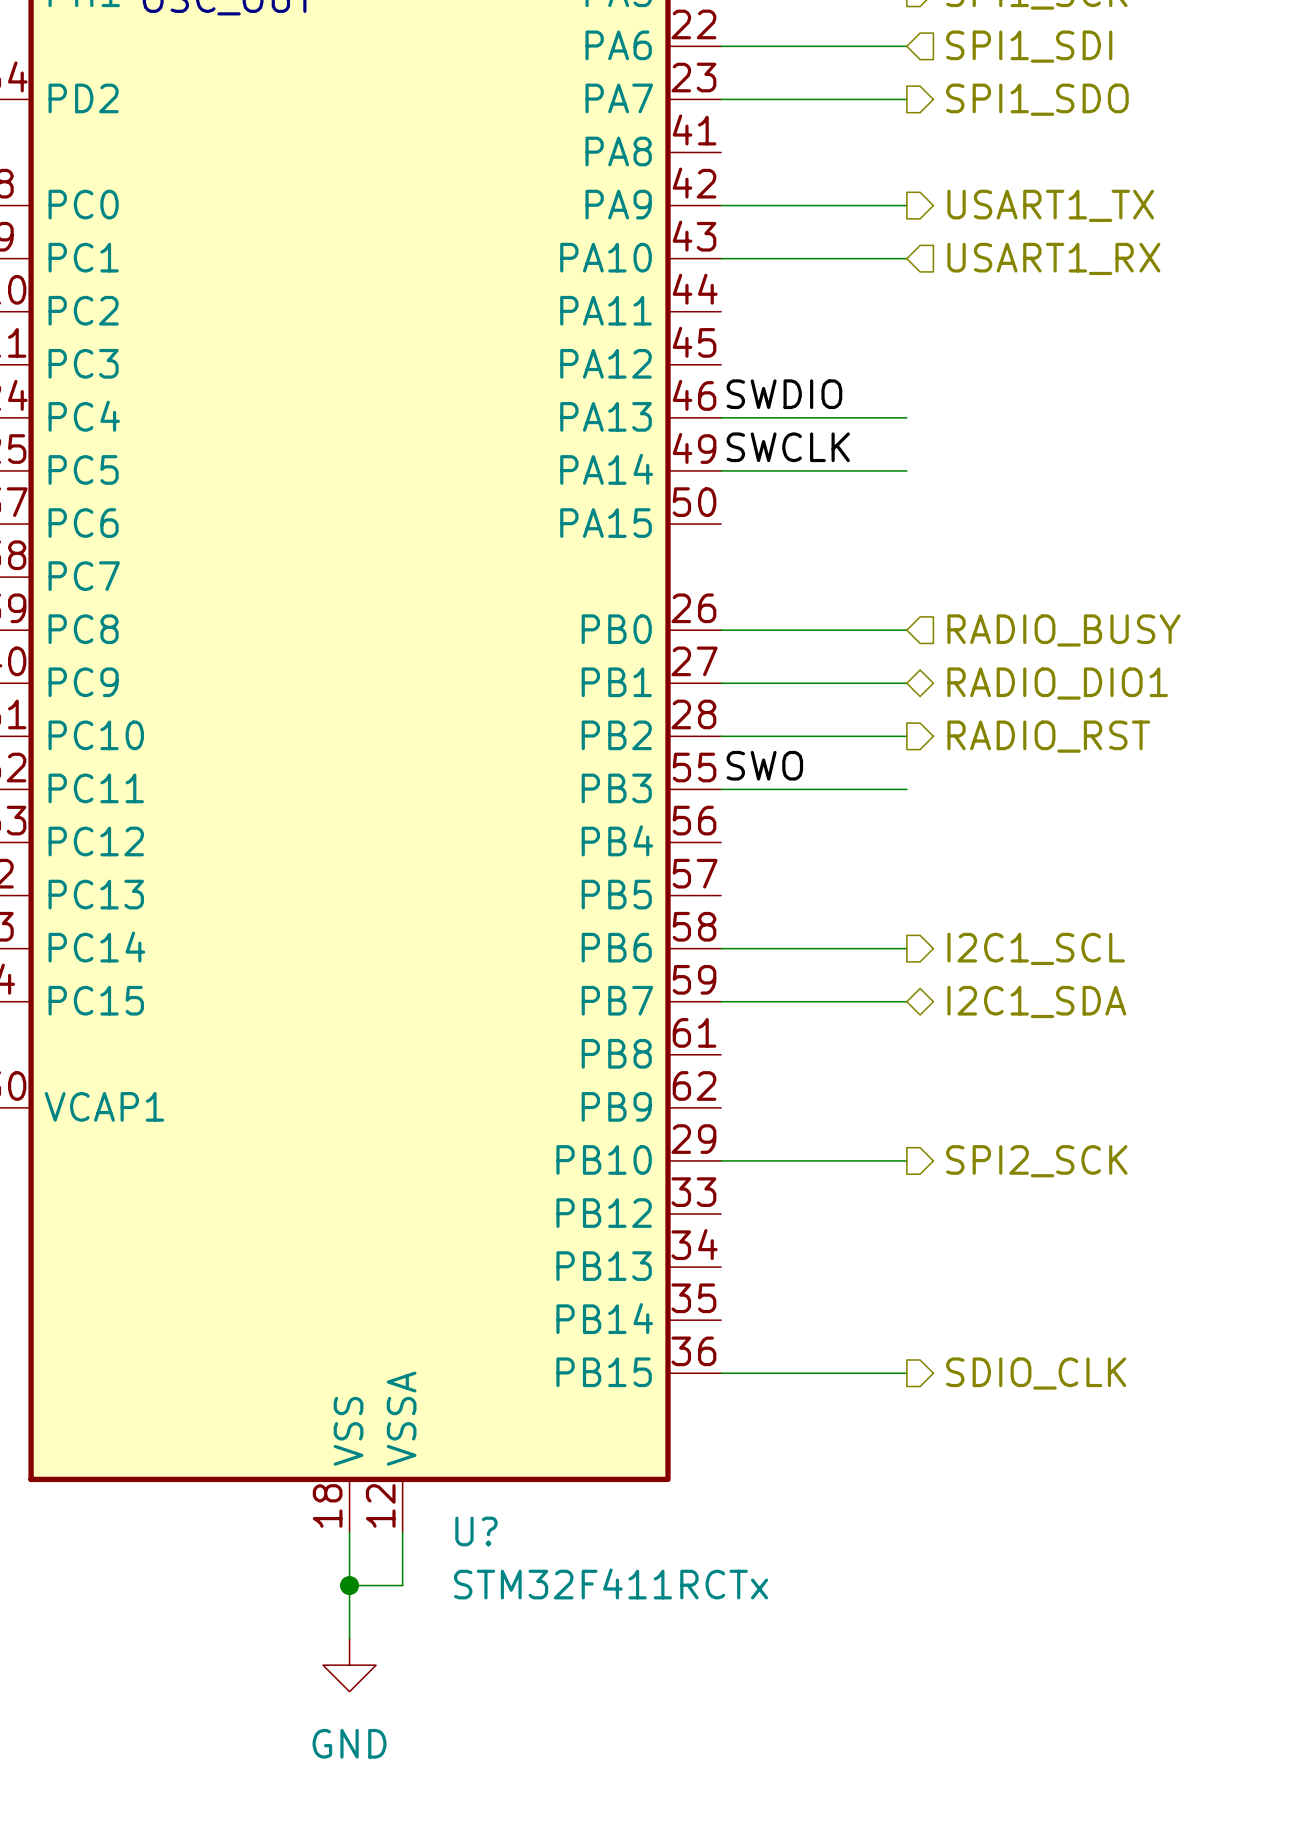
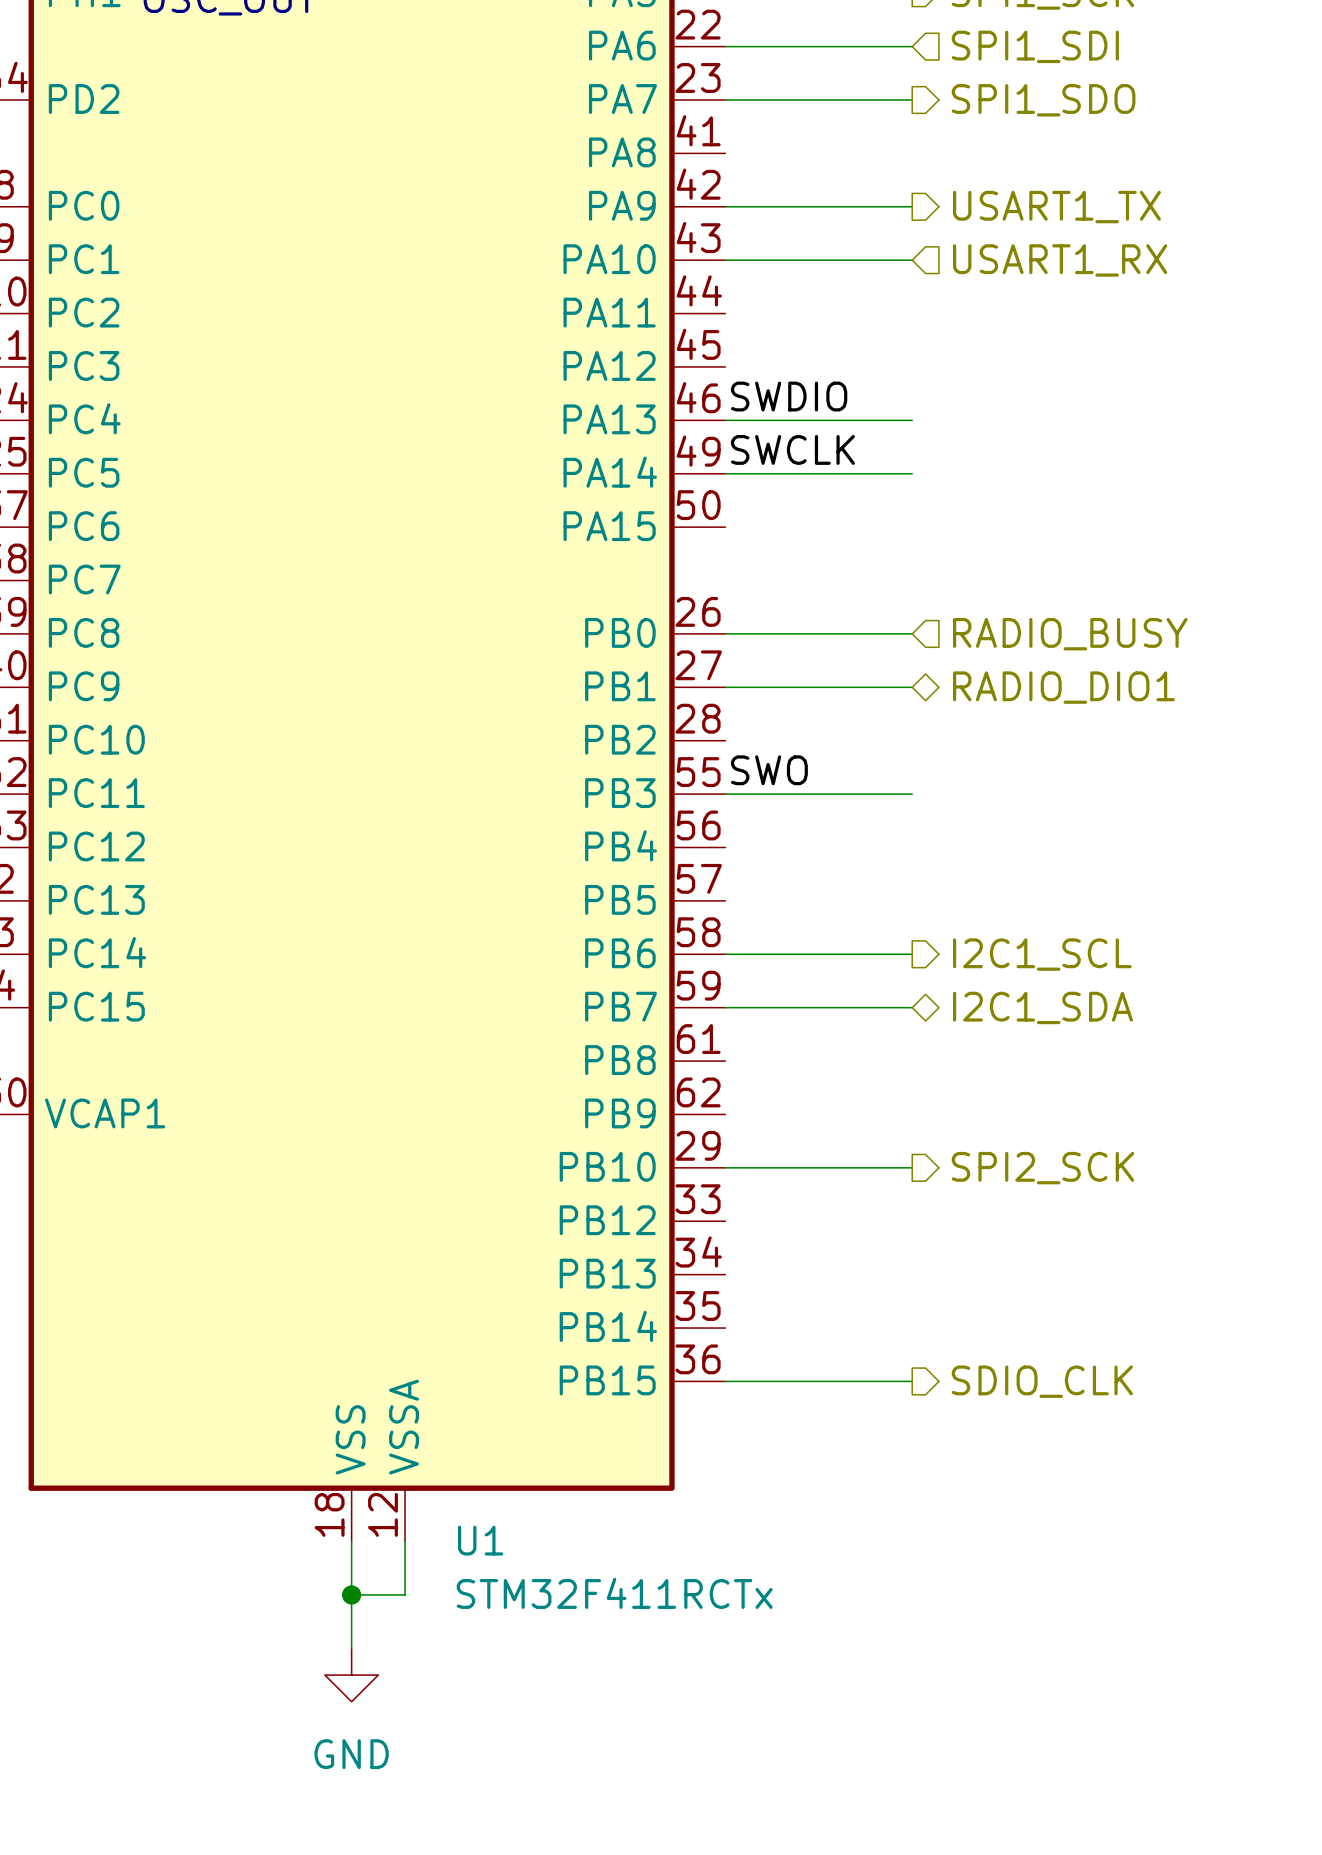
wire: (721, 736) (906, 736) -> none
hierarchical label: RADIO_RST (1048, 736) -> none
U? name: U? (476, 1531) -> U1 (480, 1540)

